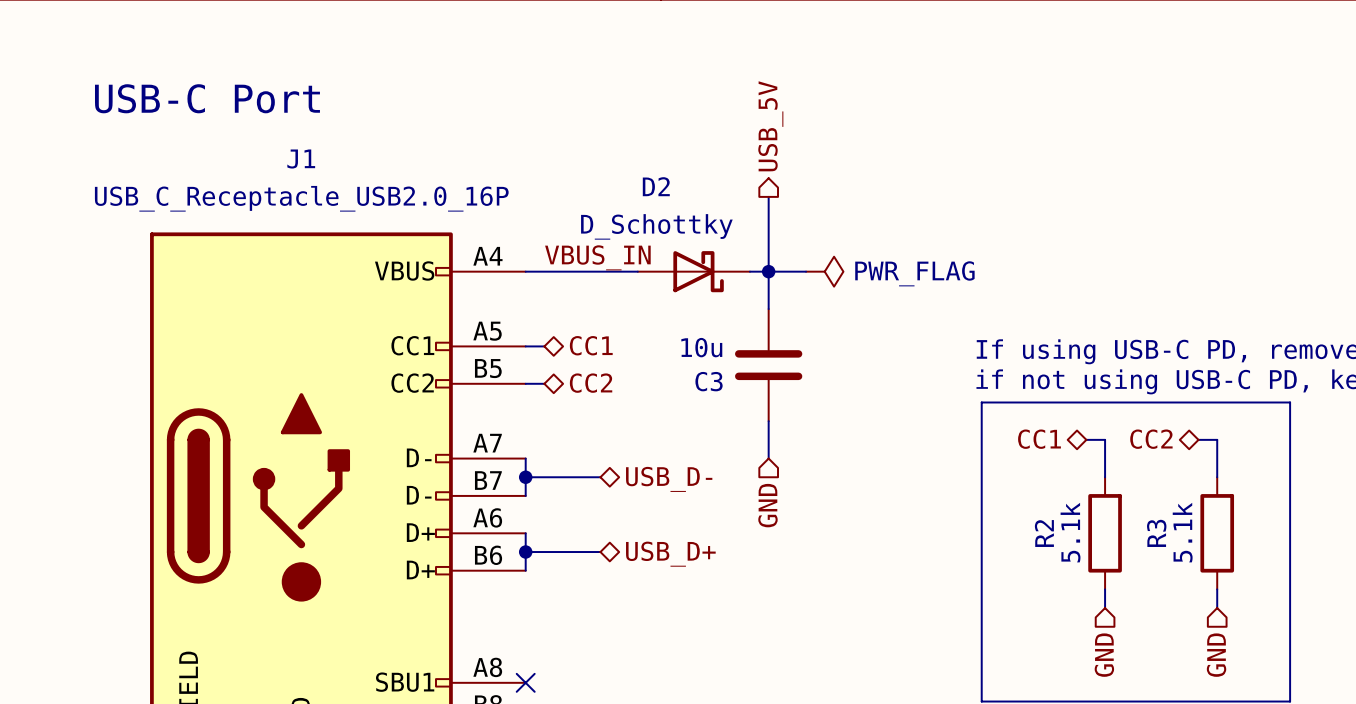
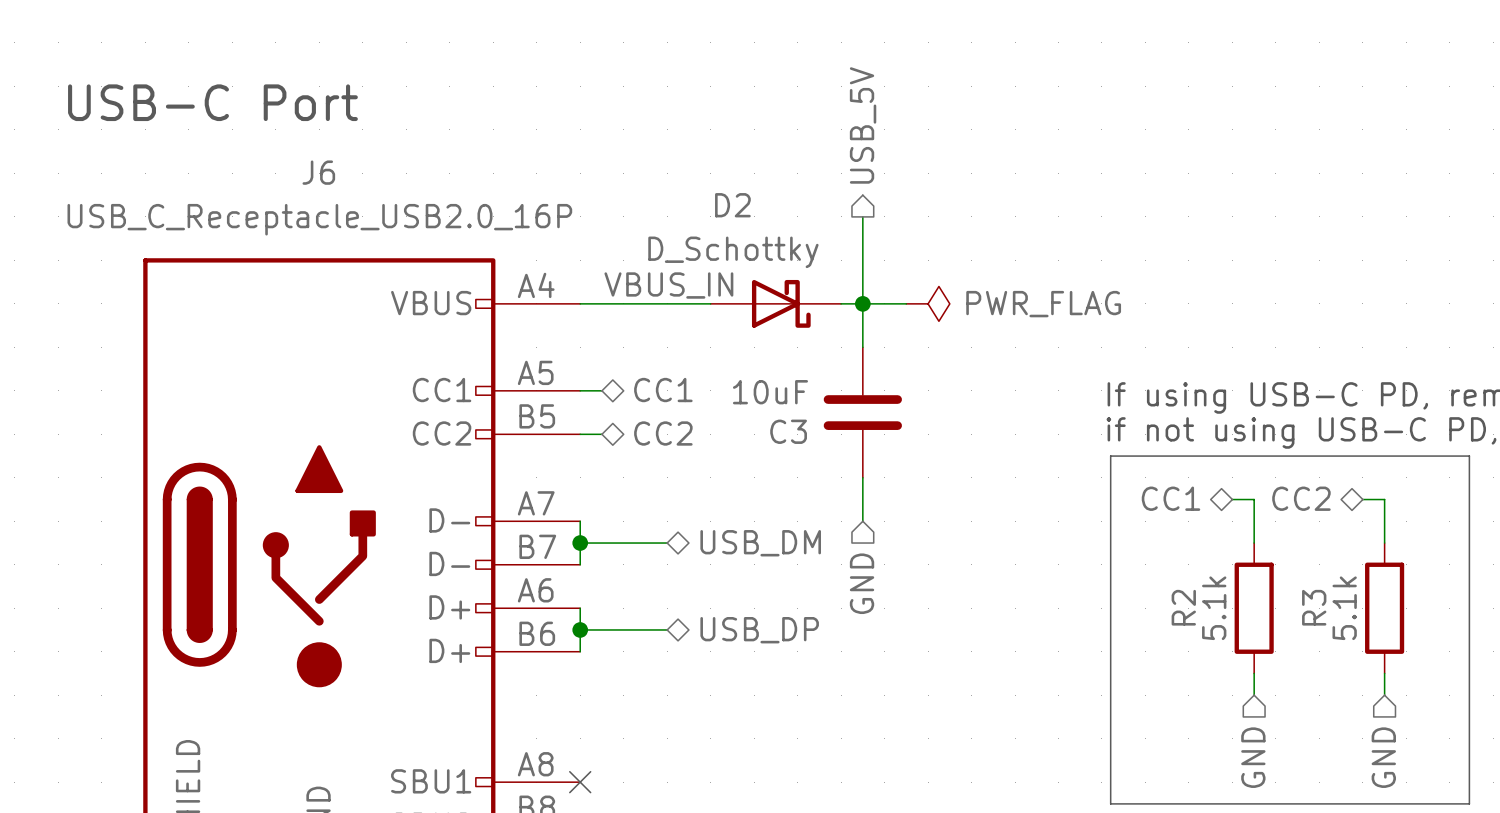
J1 name: J1 (301, 159) -> J6 (318, 172)
C3 value: 10u (701, 347) -> 10uF (770, 392)
hierarchical label: USB_D- (669, 479) -> USB_DM (760, 543)
hierarchical label: USB_D+ (670, 554) -> USB_DP (759, 630)

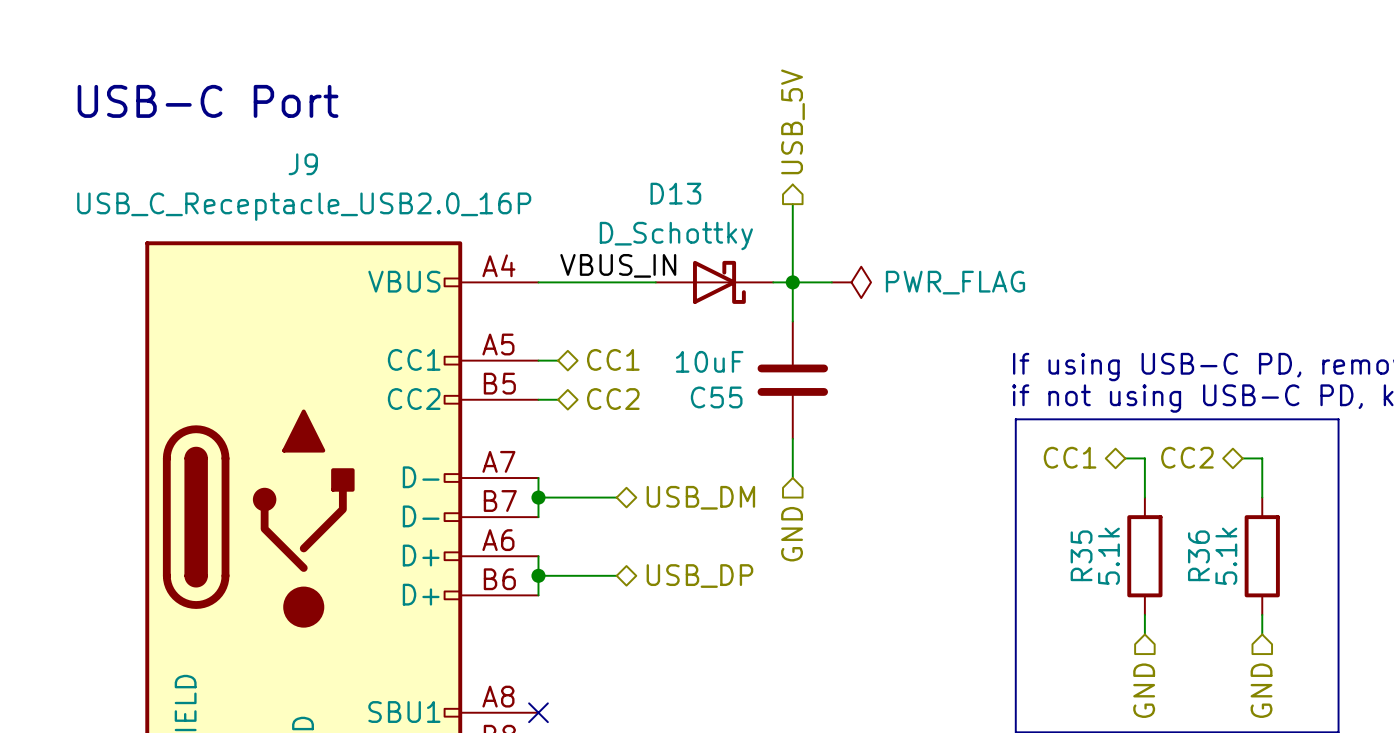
J6 name: J6 (318, 172) -> J9 (303, 164)
D2 name: D2 (732, 205) -> D13 (675, 193)
C3 name: C3 (788, 431) -> C55 (716, 397)
R2 name: R2 (1183, 607) -> R35 (1081, 555)
R3 name: R3 (1314, 607) -> R36 (1198, 555)

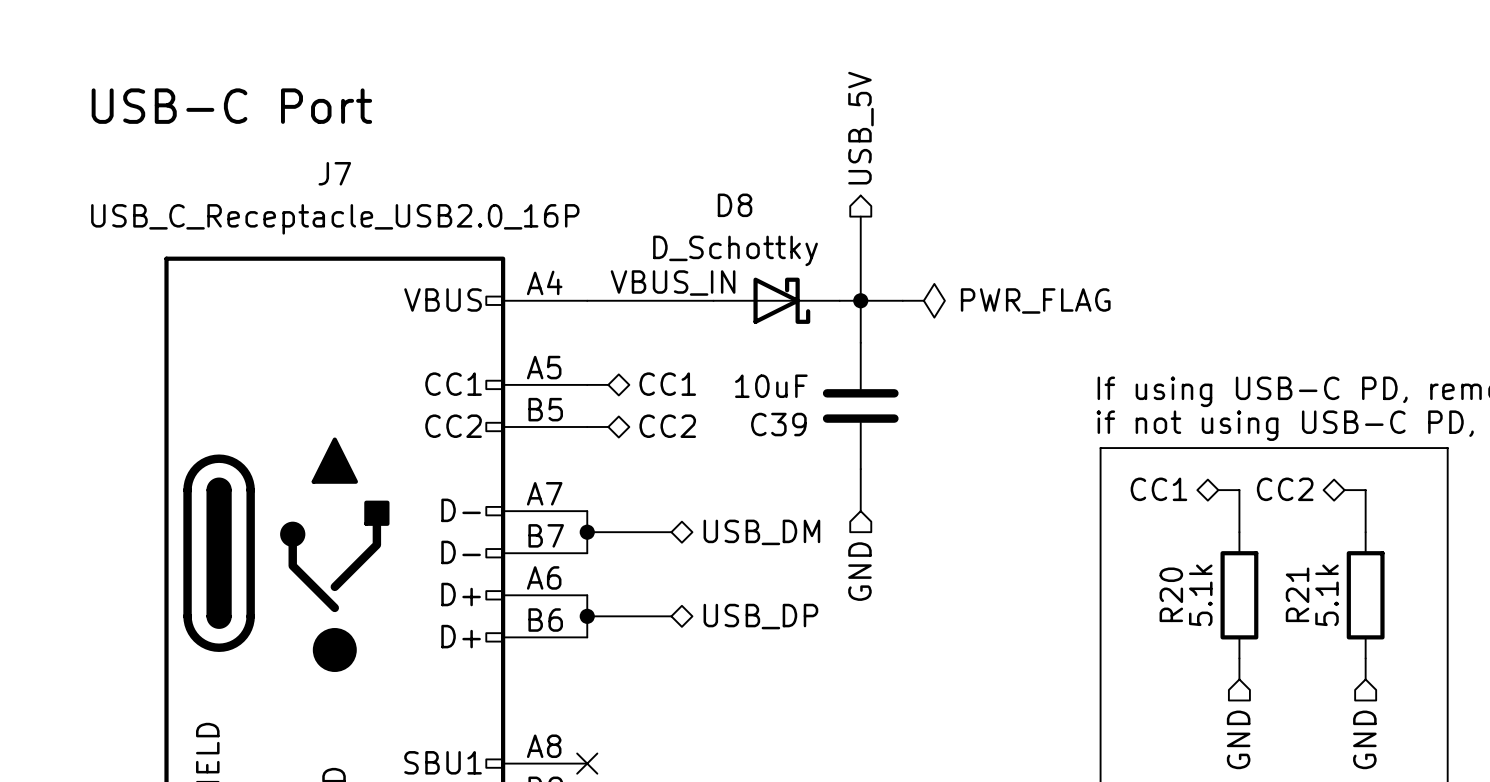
J9 name: J9 (303, 164) -> J7 (334, 173)
D13 name: D13 (675, 193) -> D8 (735, 205)
C55 name: C55 (716, 397) -> C39 (778, 424)
R35 name: R35 (1081, 555) -> R20 (1171, 594)
R36 name: R36 (1198, 555) -> R21 (1297, 594)

